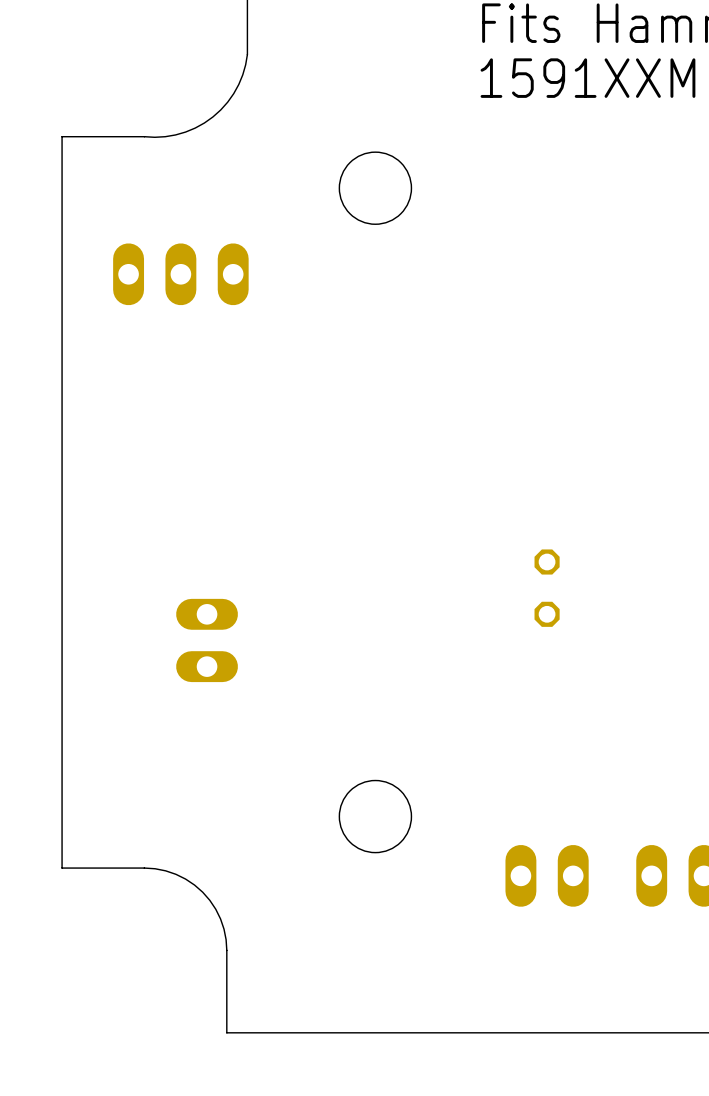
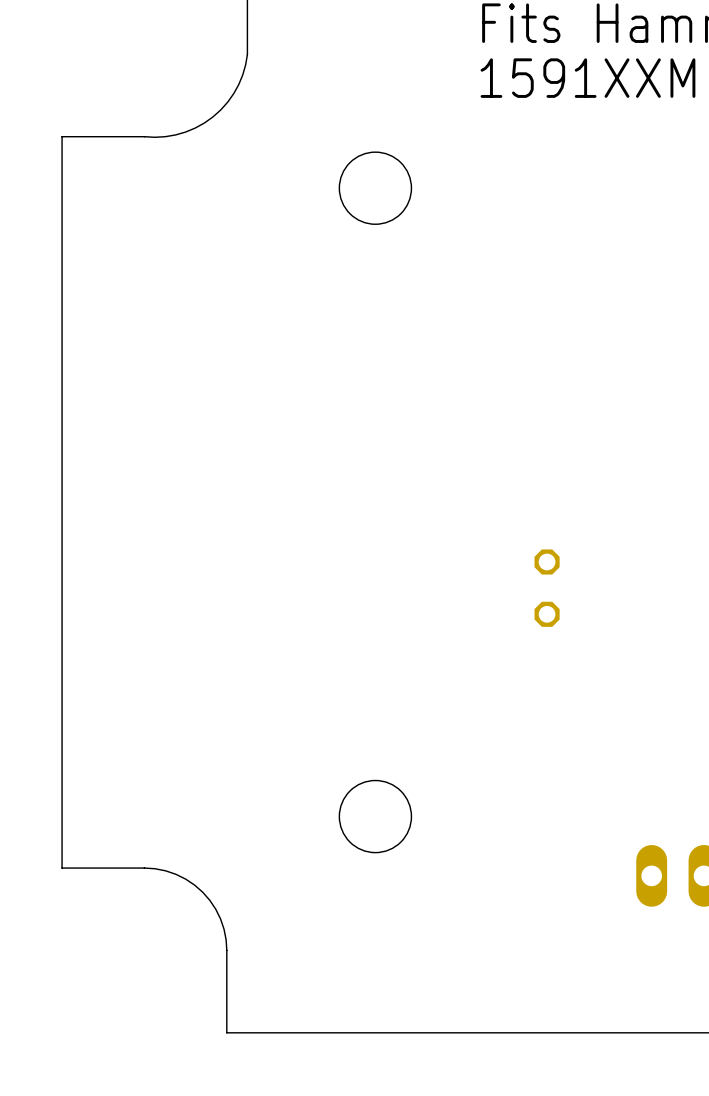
part: (180, 274) -> none
part: (207, 640) -> none
part: (547, 875) -> none

